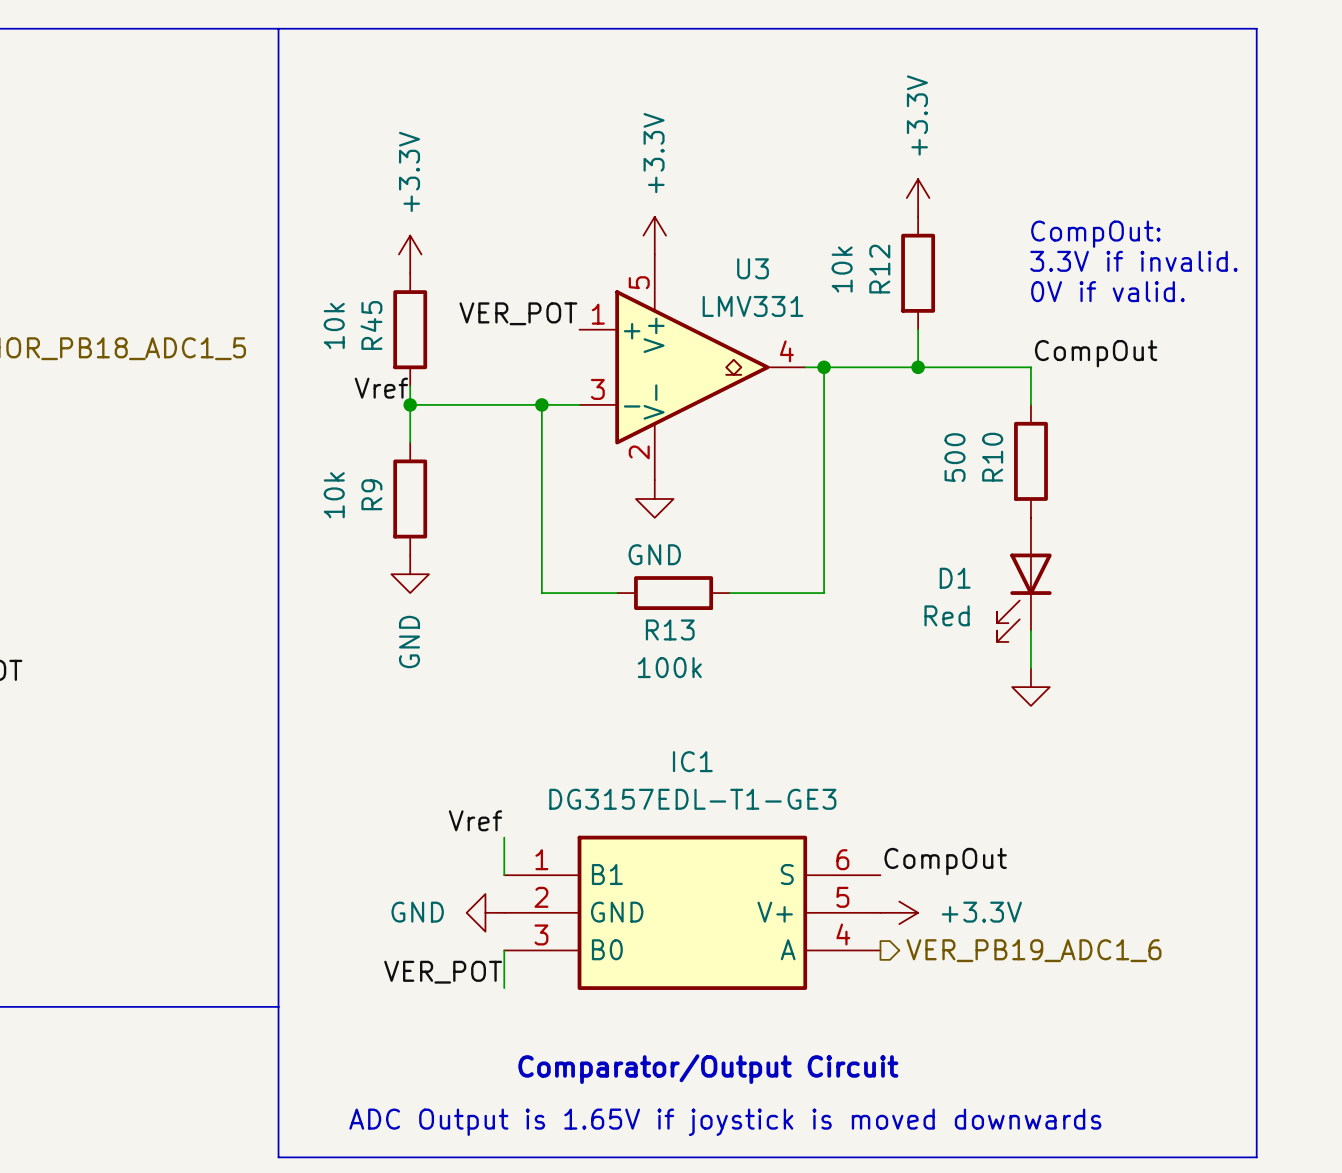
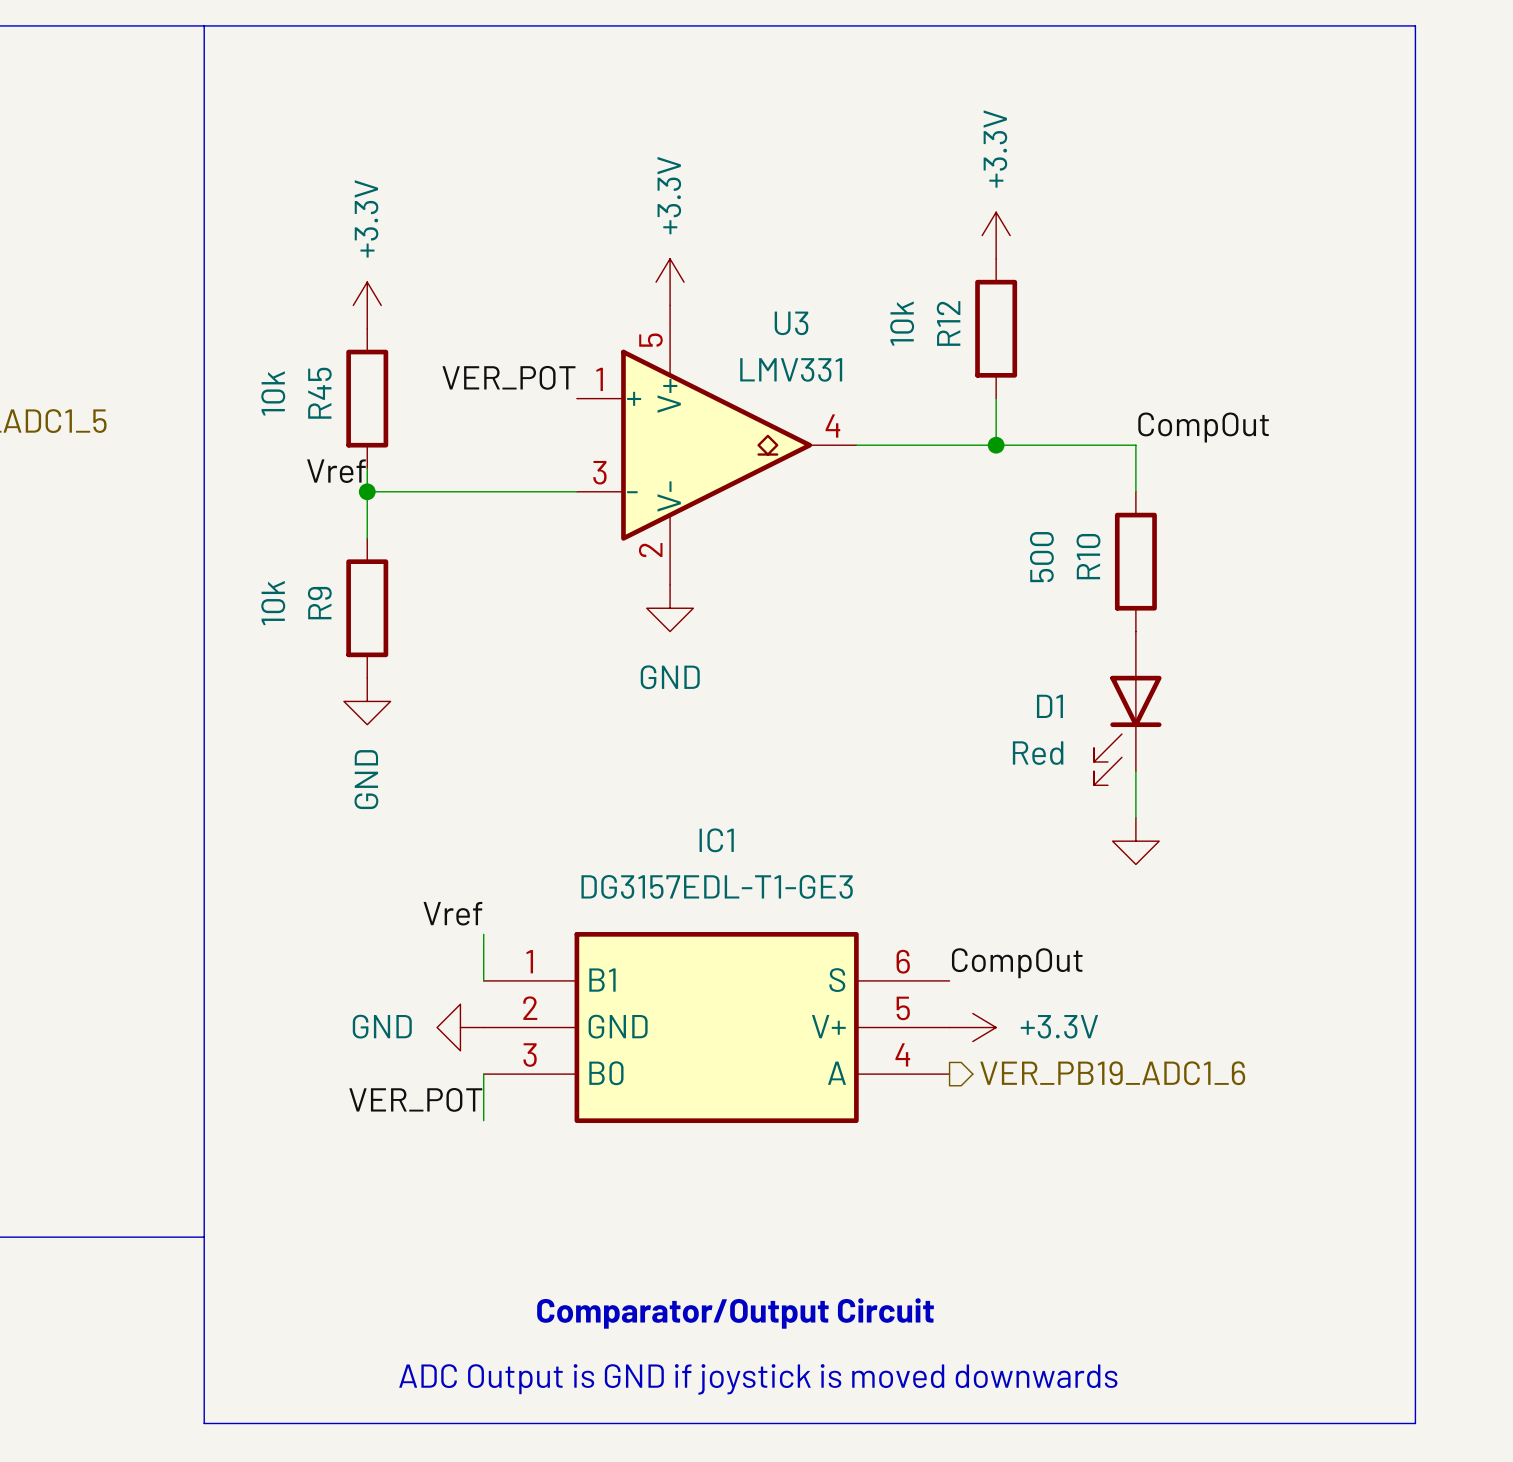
text: CompOut: (1095, 234) -> none
text: 3.3V if invalid. (1133, 261) -> none
text: 0V if valid. (1107, 291) -> none
wire: (824, 367) (824, 593) (729, 593) -> none
junction: (824, 367) -> none
wire: (541, 404) (541, 593) (617, 593) -> none
junction: (541, 404) -> none
R13: 100k (673, 593) -> none
label position: Vref (475, 820) -> Vref (452, 913)
wire: (504, 837) (504, 875) -> (483, 1120) (483, 1074)
label position: CompOut (945, 861) -> CompOut (1017, 963)
power symbol position: GND (485, 912) -> GND (460, 1027)
IC1 position: (692, 912) -> (716, 1027)
power symbol position: +3.3V (899, 912) -> +3.3V (972, 1027)
wire: (504, 950) (504, 988) -> (483, 934) (483, 980)
hierarchical label position: VER_PB19_ADC1_6 (1034, 950) -> VER_PB19_ADC1_6 (1112, 1073)
label position: VER_POT (443, 972) -> VER_POT (415, 1099)
text: ADC Output is 1.65V if joystick is moved downwards (725, 1122) -> ADC Output is GND if joystick is moved downwards (758, 1379)

